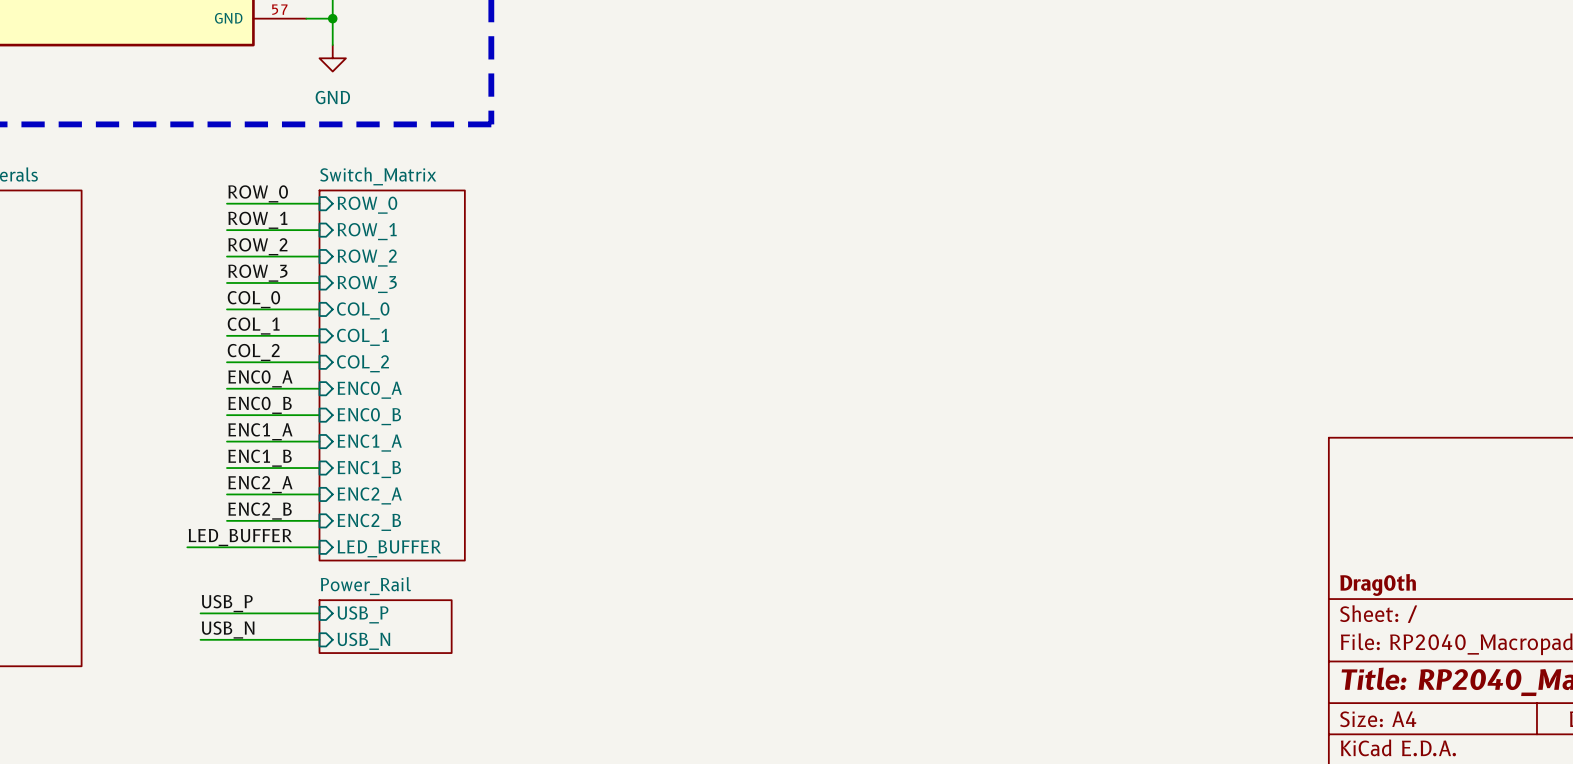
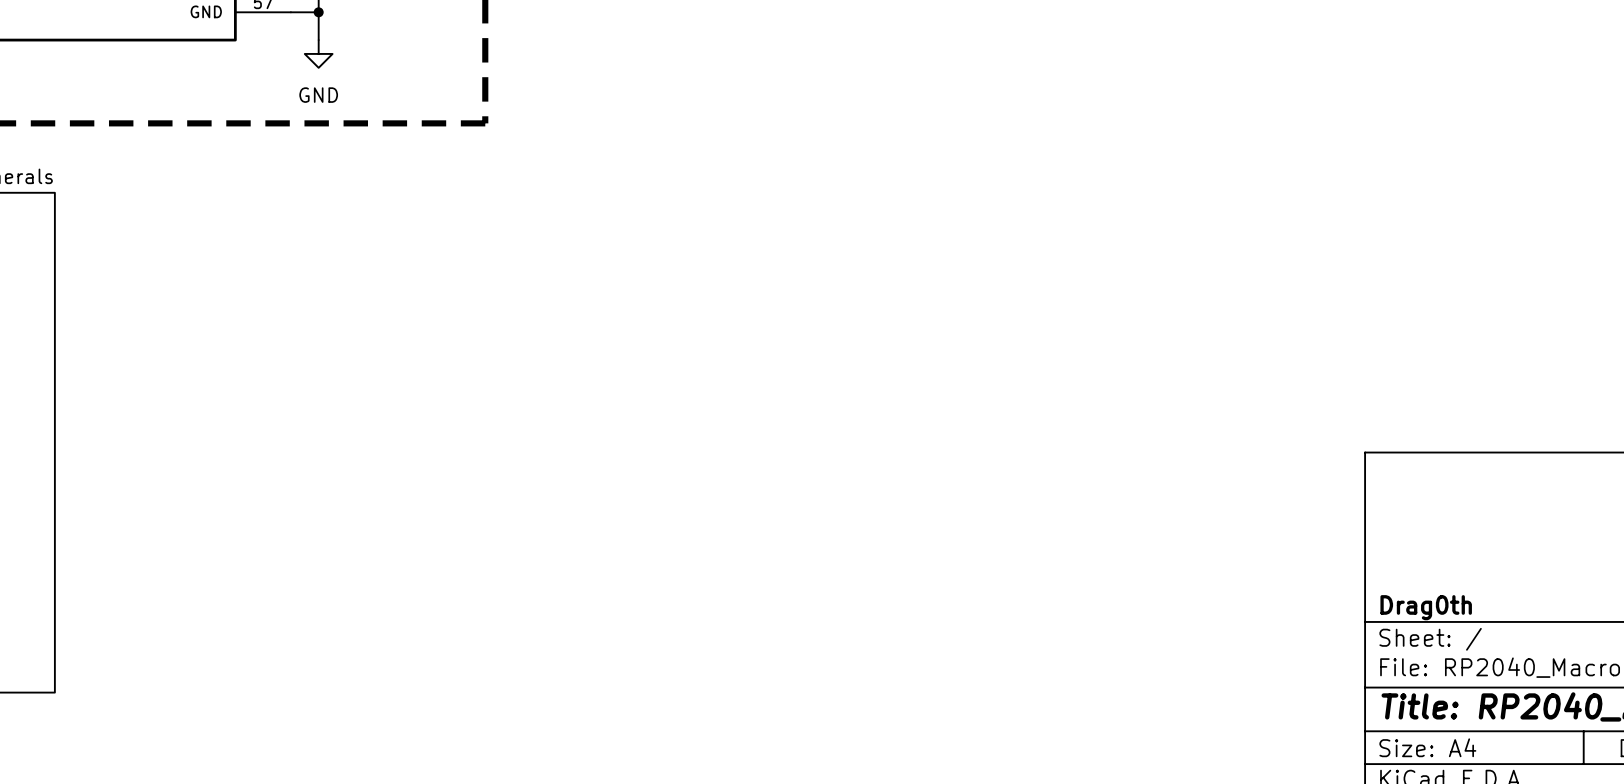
label: ROW_0 (258, 193) -> none
wire: (226, 203) (319, 203) -> none
sheet pin: ROW_0 (367, 205) -> none
label: ROW_1 (257, 220) -> none
wire: (226, 230) (319, 230) -> none
sheet pin: ROW_1 (367, 231) -> none
label: ROW_2 (257, 246) -> none
wire: (226, 256) (319, 256) -> none
sheet pin: ROW_2 (367, 258) -> none
label: ROW_3 (257, 273) -> none
wire: (226, 282) (319, 282) -> none
sheet pin: ROW_3 (367, 284) -> none
label: COL_0 (253, 299) -> none
wire: (226, 309) (319, 309) -> none
sheet pin: COL_0 (363, 310) -> none
label: COL_1 (253, 326) -> none
wire: (226, 335) (319, 335) -> none
sheet pin: COL_1 (362, 337) -> none
label: COL_2 (253, 352) -> none
wire: (226, 362) (319, 362) -> none
sheet pin: COL_2 (363, 363) -> none
sheet Switch_Matrix: (392, 375) -> none
label: ENC0_A (260, 378) -> none
wire: (226, 388) (319, 388) -> none
sheet pin: ENC0_A (369, 390) -> none
label: ENC0_B (260, 405) -> none
wire: (226, 415) (319, 415) -> none
sheet pin: ENC0_B (369, 416) -> none
label: ENC1_A (260, 431) -> none
wire: (226, 441) (319, 441) -> none
sheet pin: ENC1_A (369, 443) -> none
label: ENC1_B (260, 458) -> none
wire: (226, 468) (319, 468) -> none
sheet pin: ENC1_B (369, 469) -> none
label: ENC2_A (260, 484) -> none
wire: (226, 494) (319, 494) -> none
sheet pin: ENC2_A (369, 495) -> none
label: ENC2_B (260, 511) -> none
wire: (226, 520) (319, 520) -> none
sheet pin: ENC2_B (369, 522) -> none
label: LED_BUFFER (240, 537) -> none
wire: (187, 547) (319, 547) -> none
sheet pin: LED_BUFFER (389, 548) -> none
label: USB_P (227, 603) -> none
wire: (200, 613) (319, 613) -> none
sheet pin: USB_P (362, 614) -> none
sheet Power_Rail: (385, 626) -> none
label: USB_N (228, 630) -> none
wire: (200, 639) (319, 639) -> none
sheet pin: USB_N (363, 641) -> none

